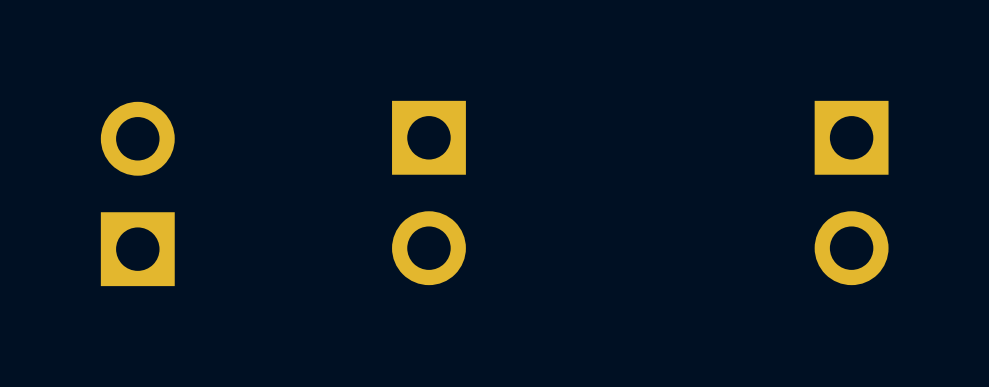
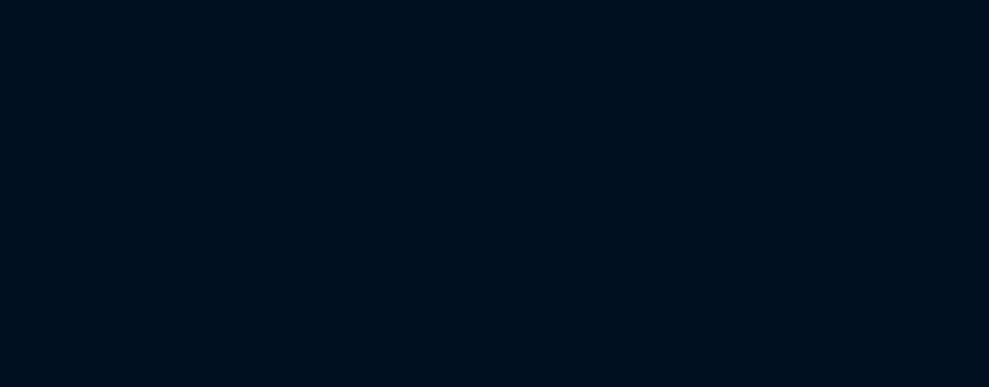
part: (428, 192) -> none
part: (851, 192) -> none
part: (137, 193) -> none

